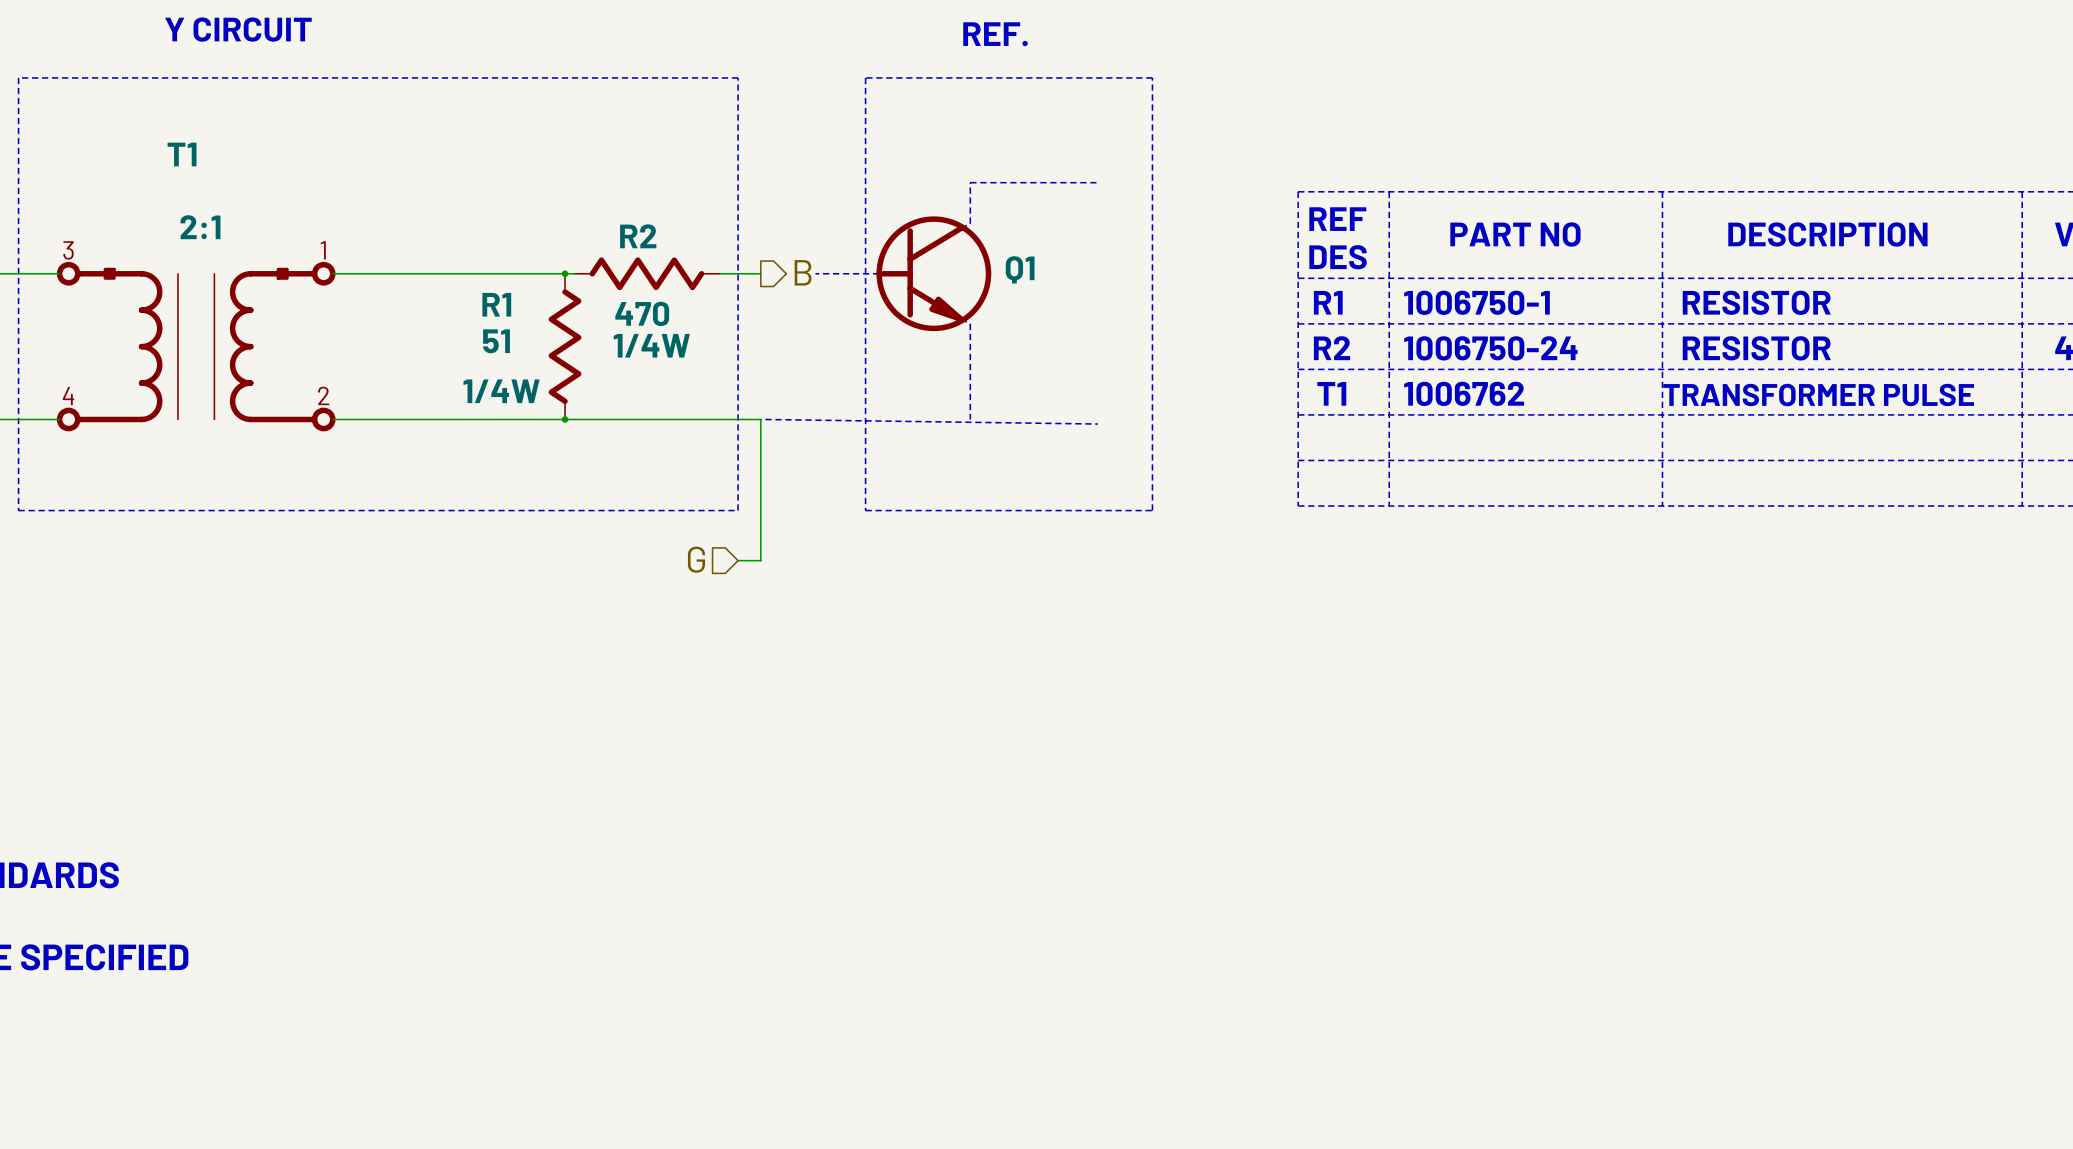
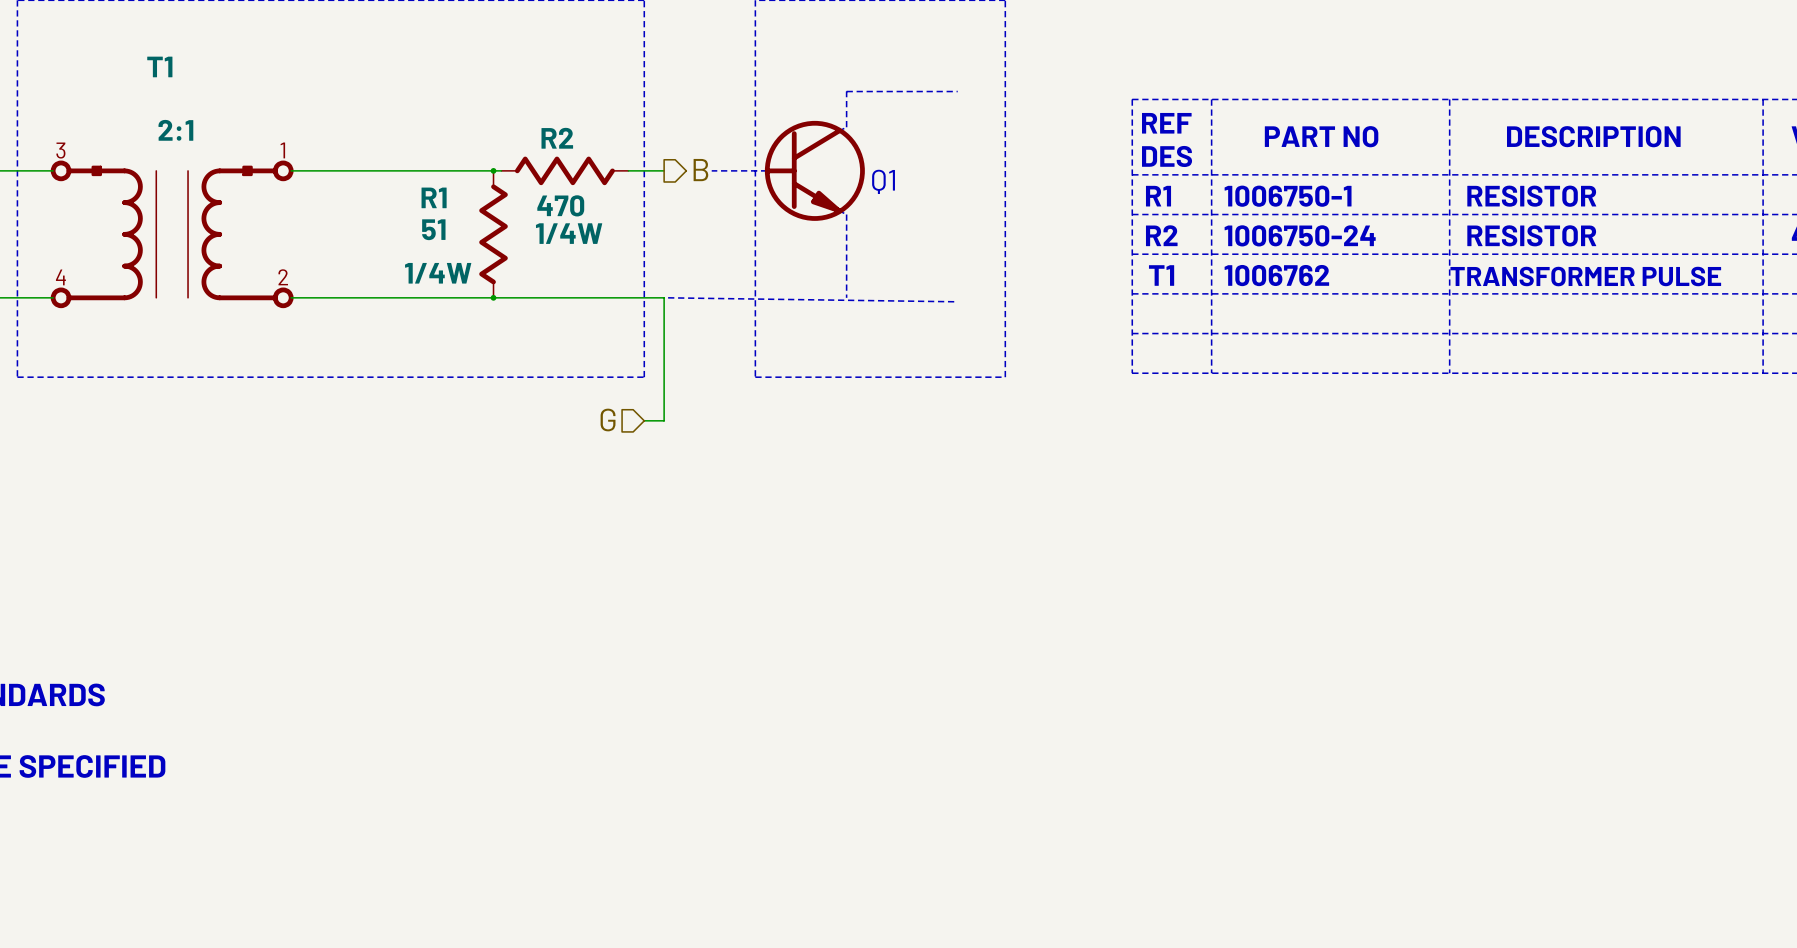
part text: Q1 (1020, 269) -> none
text: none -> Q1 (883, 181)

